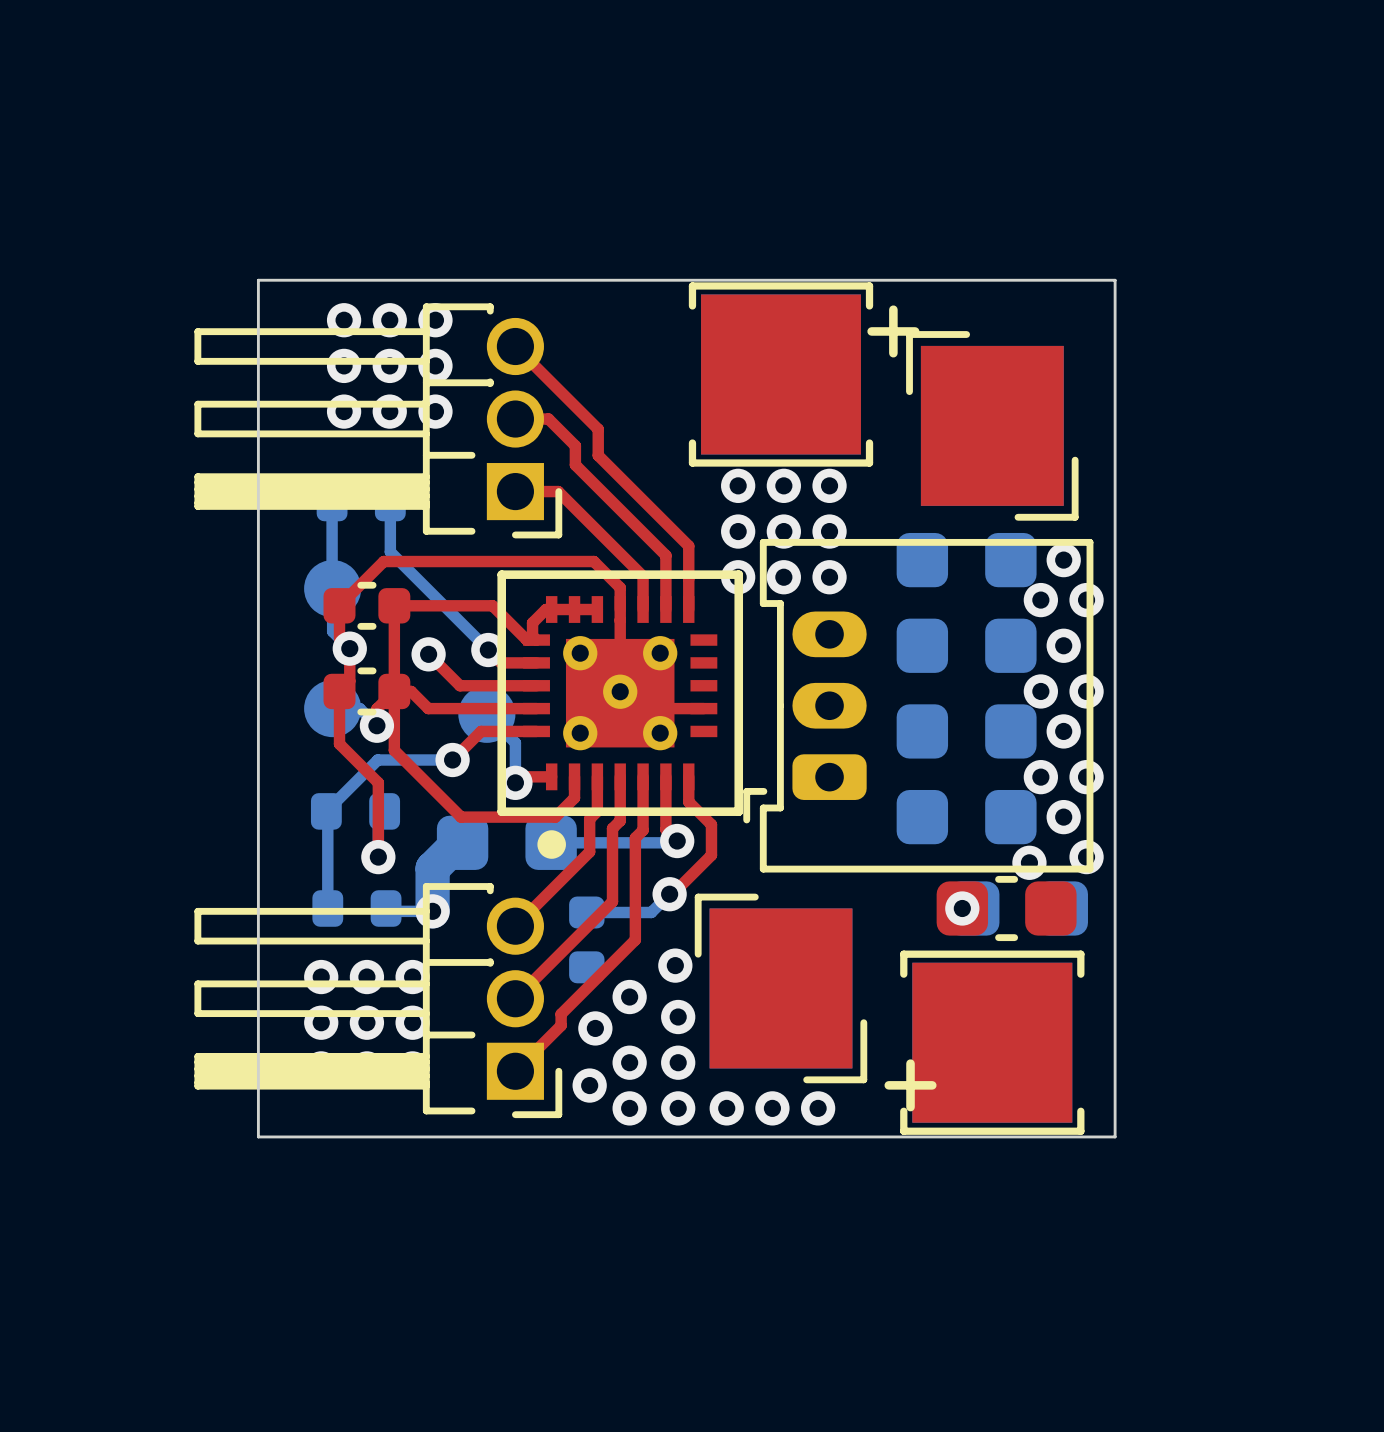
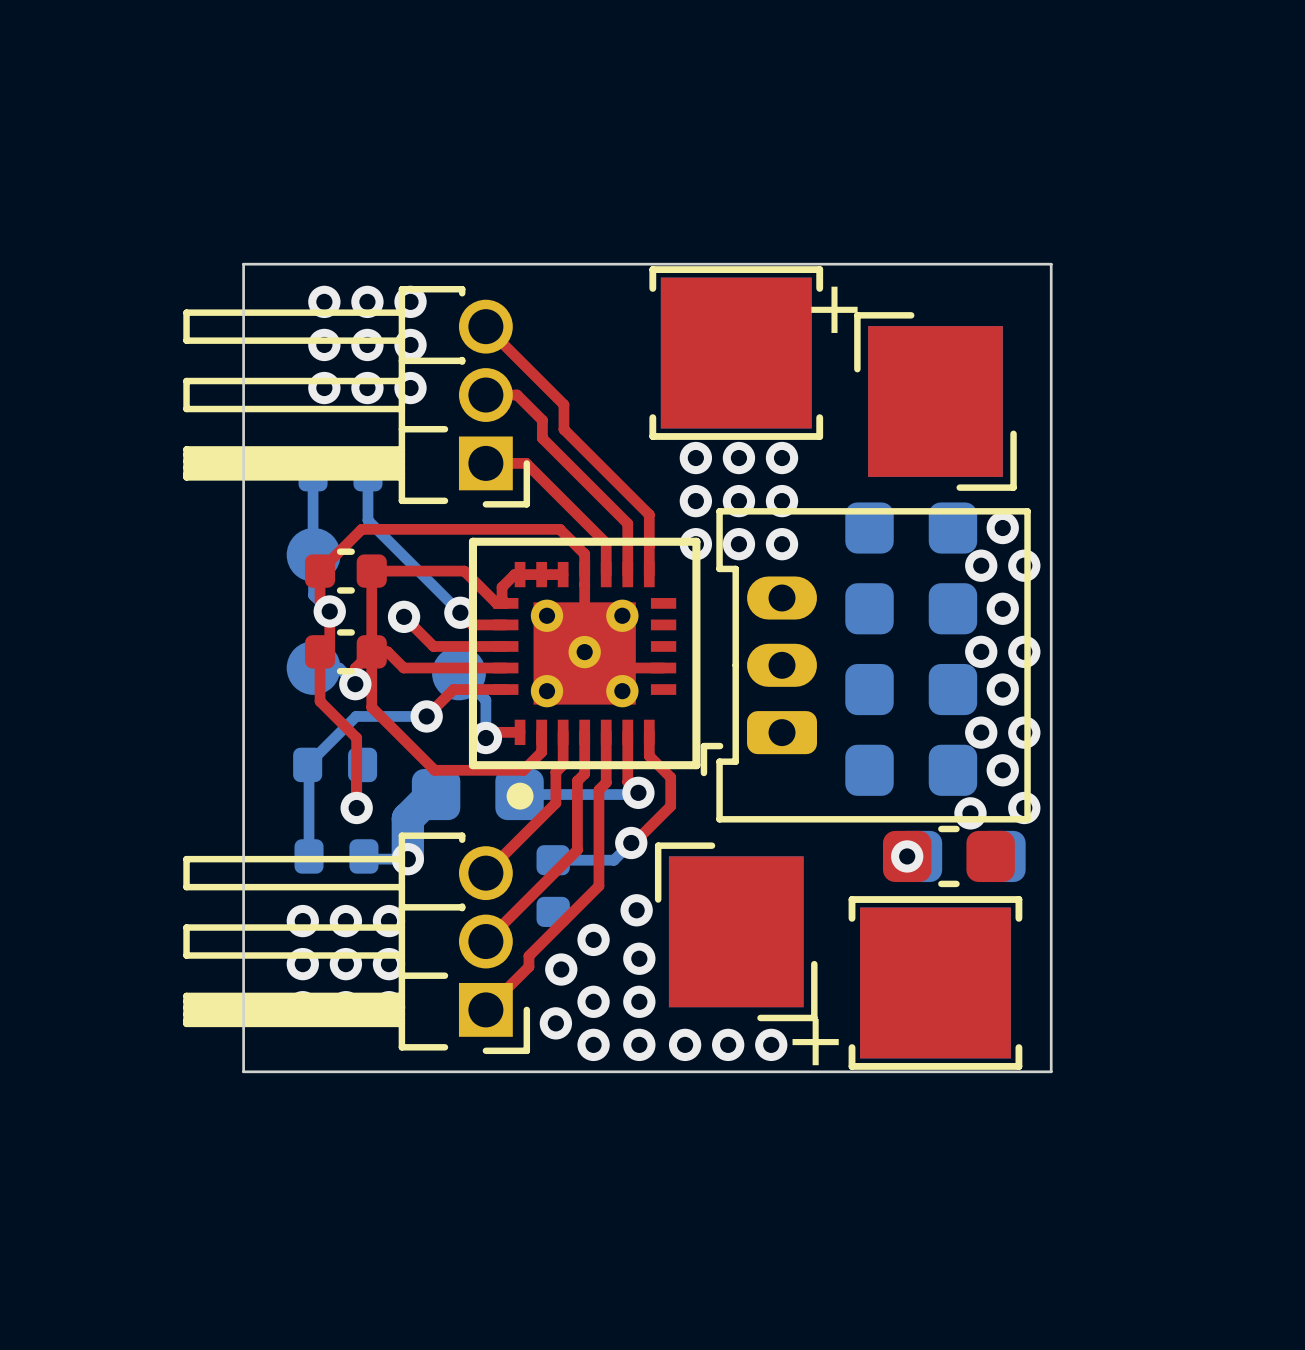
text position: + (910, 1085) -> + (815, 1042)

